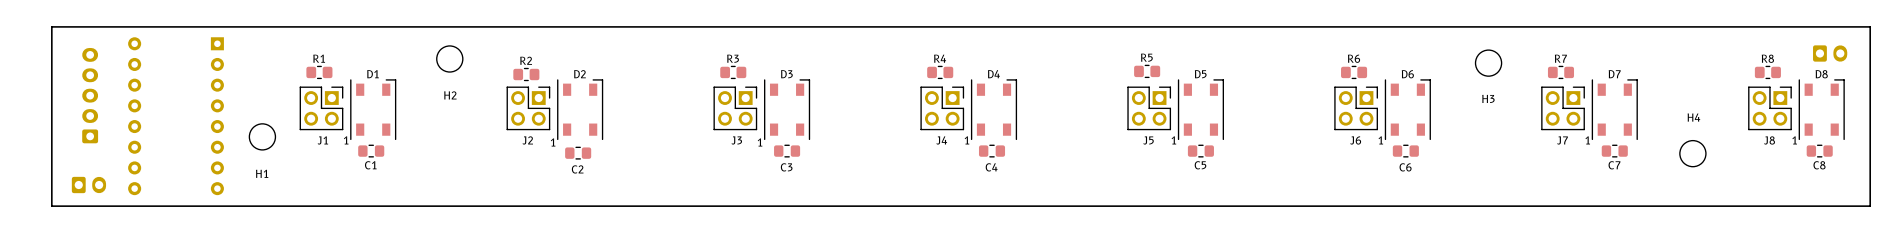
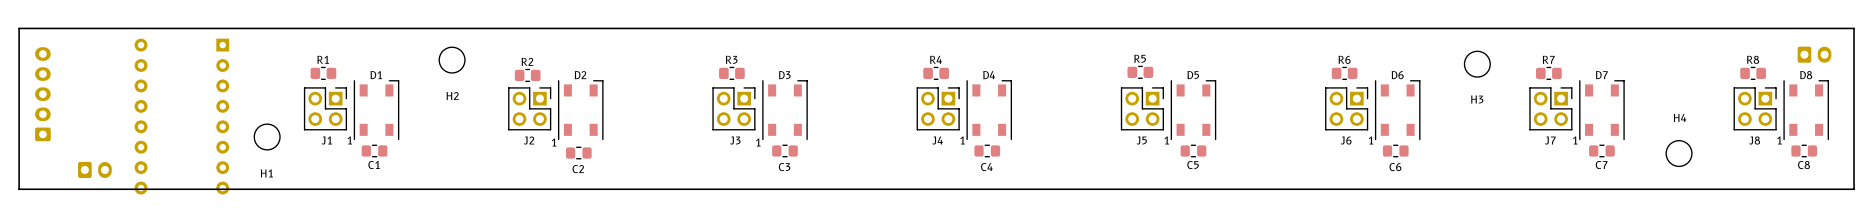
board edge: (51, 26) (51, 206) (1870, 206) (1870, 189) -> (59, 28) (19, 28) (19, 189) (1854, 189)
part position: (90, 95) -> (42, 94)
part position: (88, 185) -> (94, 169)

